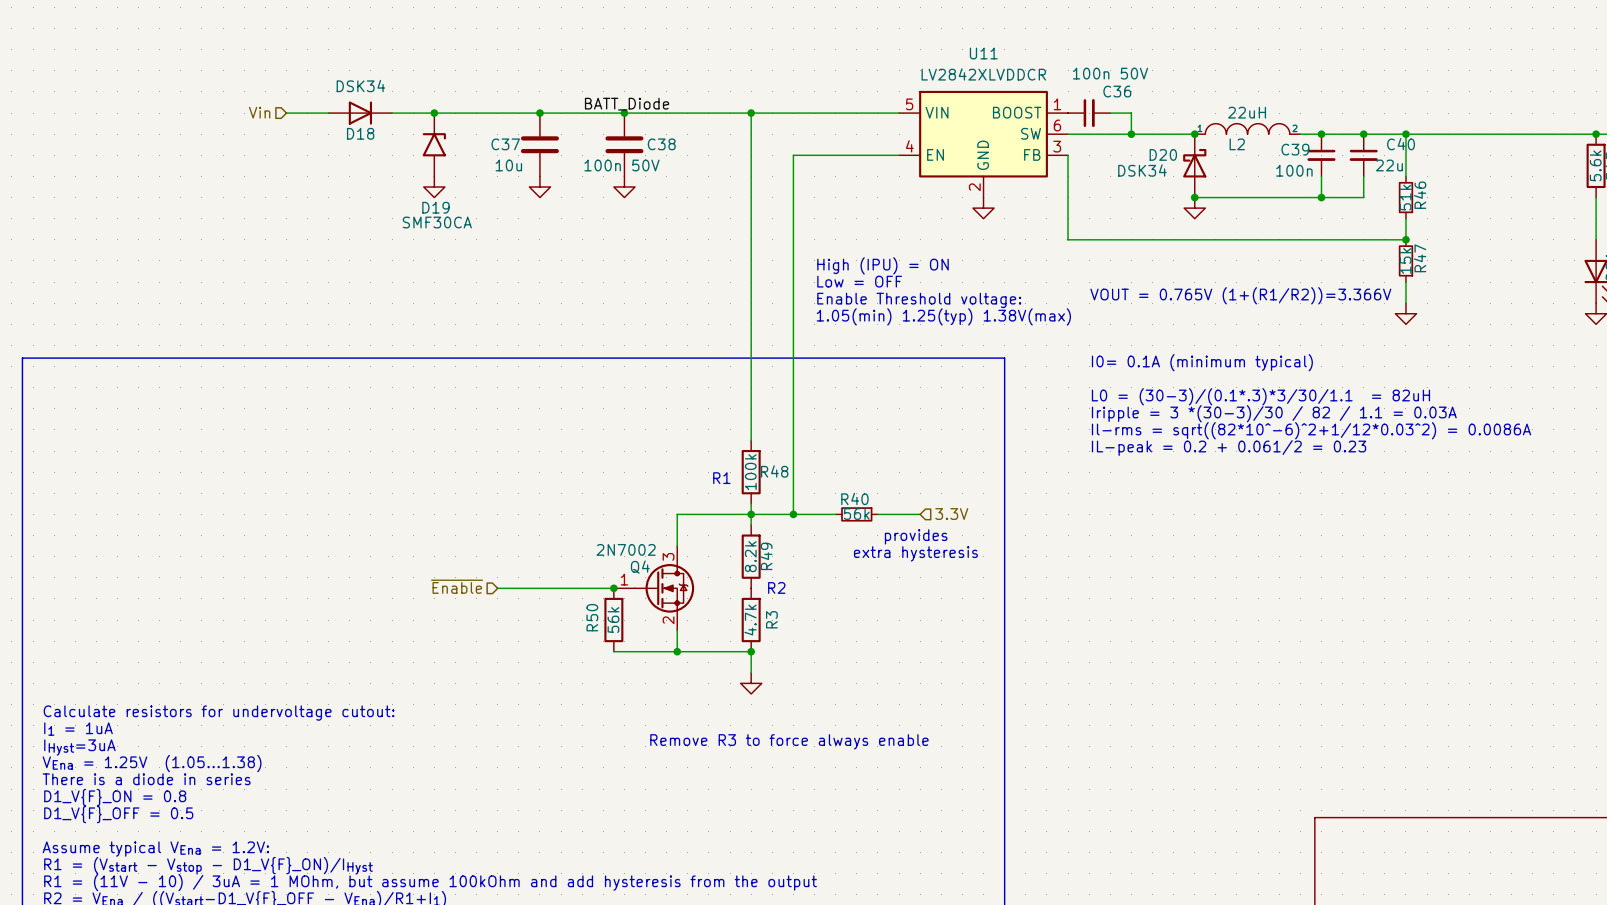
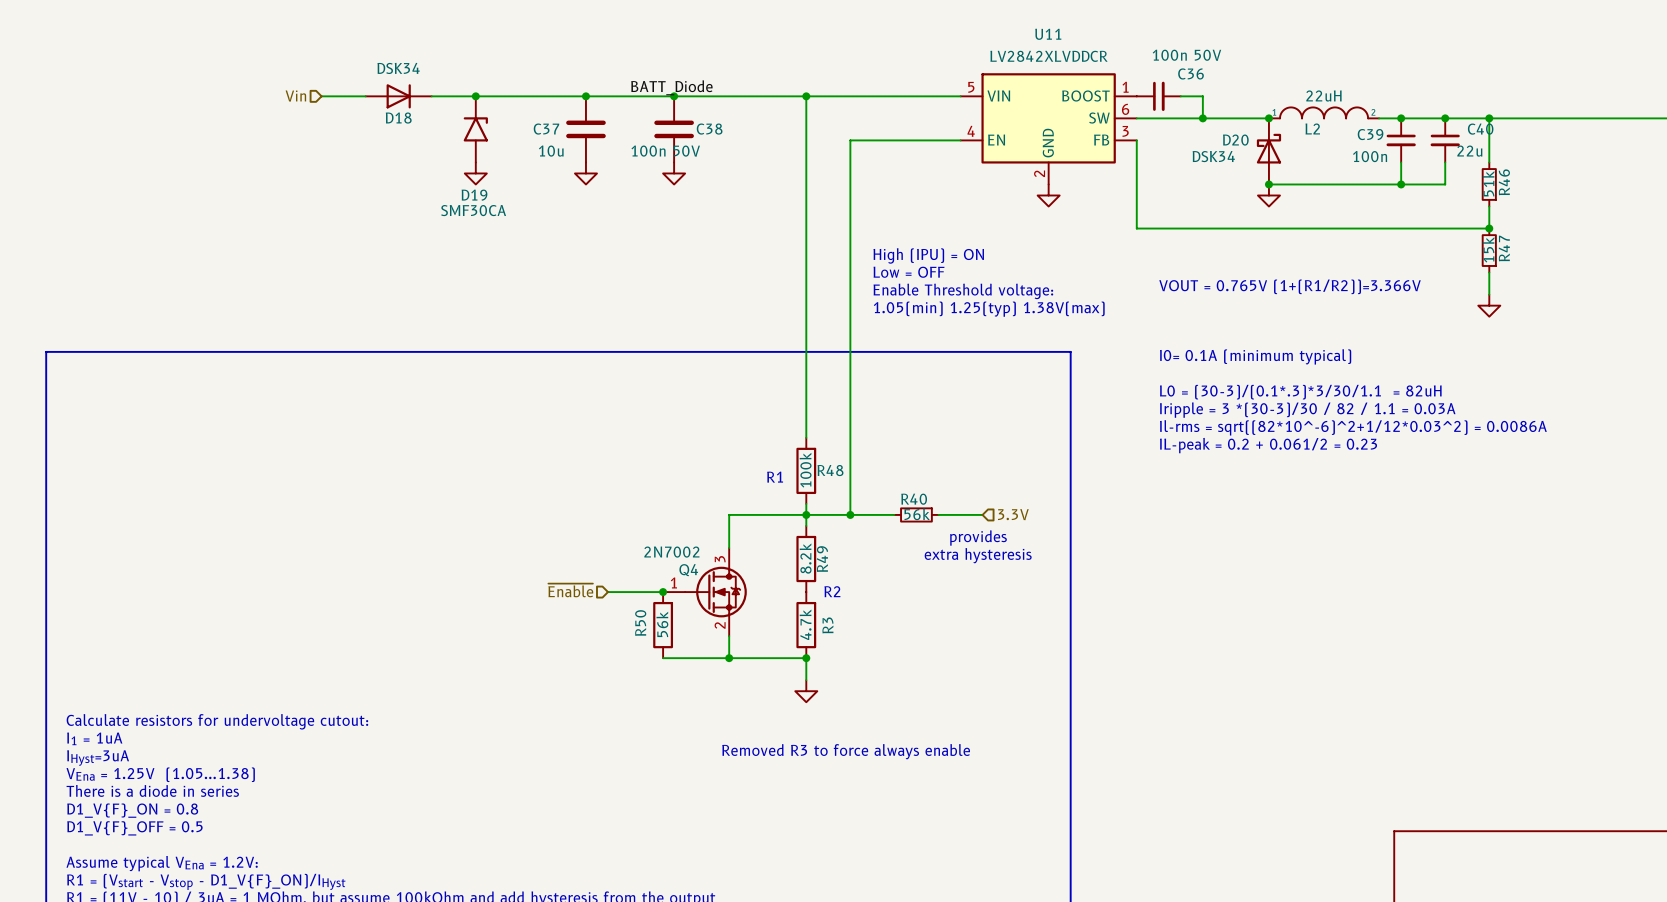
hierarchical label position: ~{Enable} (457, 586) -> ~{Enable} (570, 590)
wire: (497, 588) (561, 588) -> none
text: Remove R3 to force always enable (789, 741) -> Removed R3 to force always enable (846, 751)

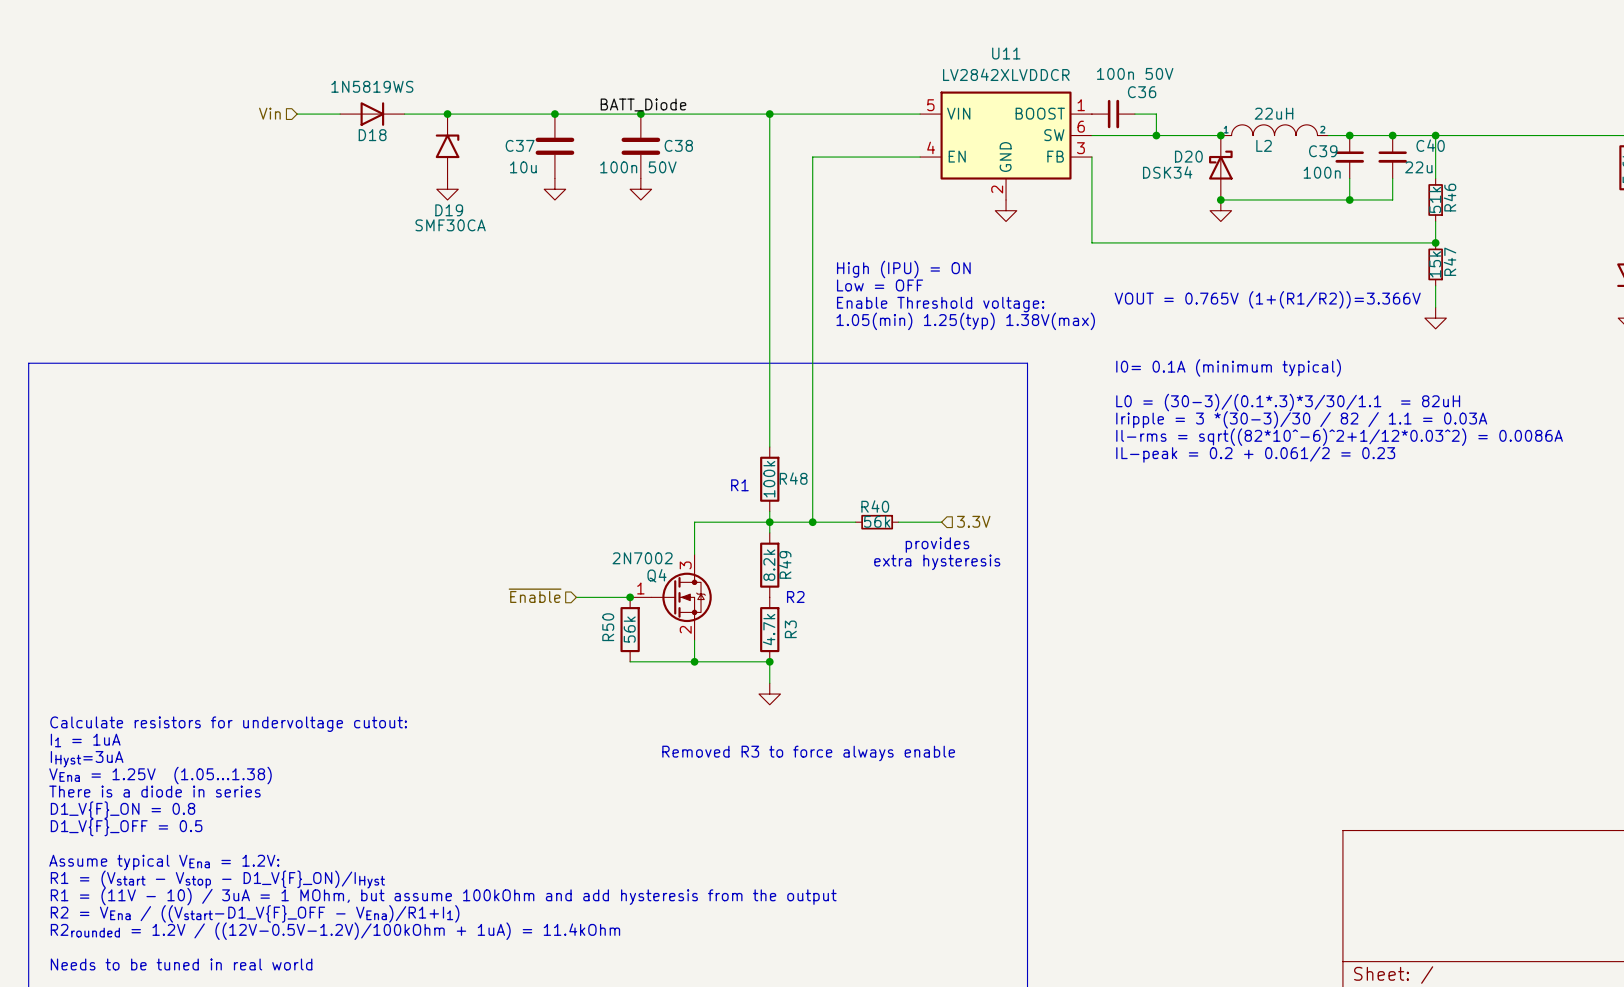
D18 value: DSK34 (398, 68) -> 1N5819WS (372, 86)

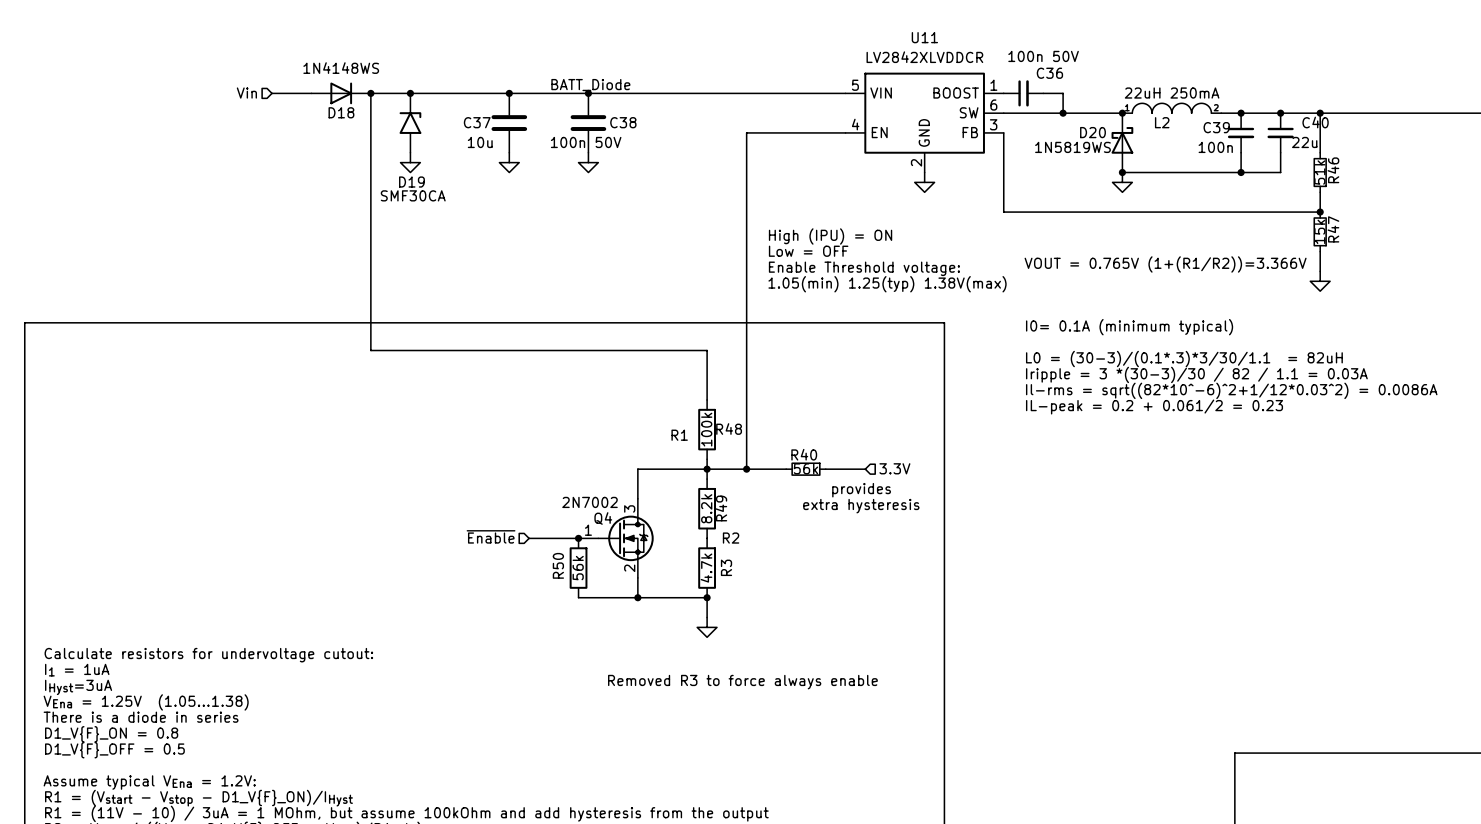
D18 value: 1N5819WS (372, 86) -> 1N4148WS (341, 68)
L2 value: 22uH (1274, 113) -> 22uH 250mA (1172, 93)
junction: none -> (370, 93)
wire: (769, 114) (769, 393) -> (370, 93) (370, 350) (707, 350)
junction: (769, 114) -> none
D20 value: DSK34 (1167, 172) -> 1N5819WS (1072, 147)

